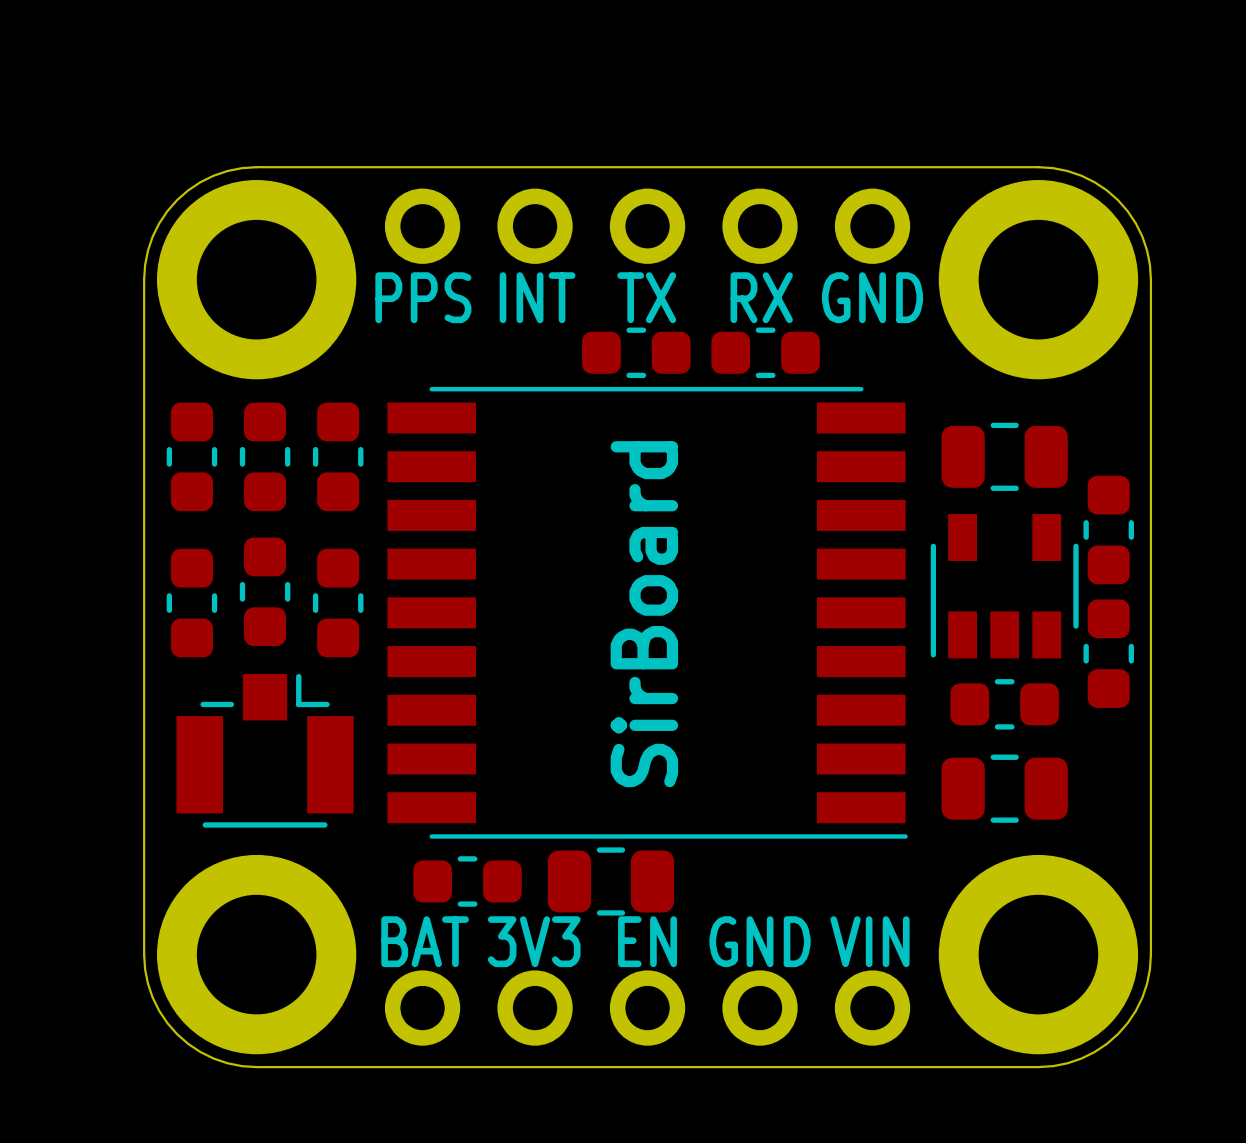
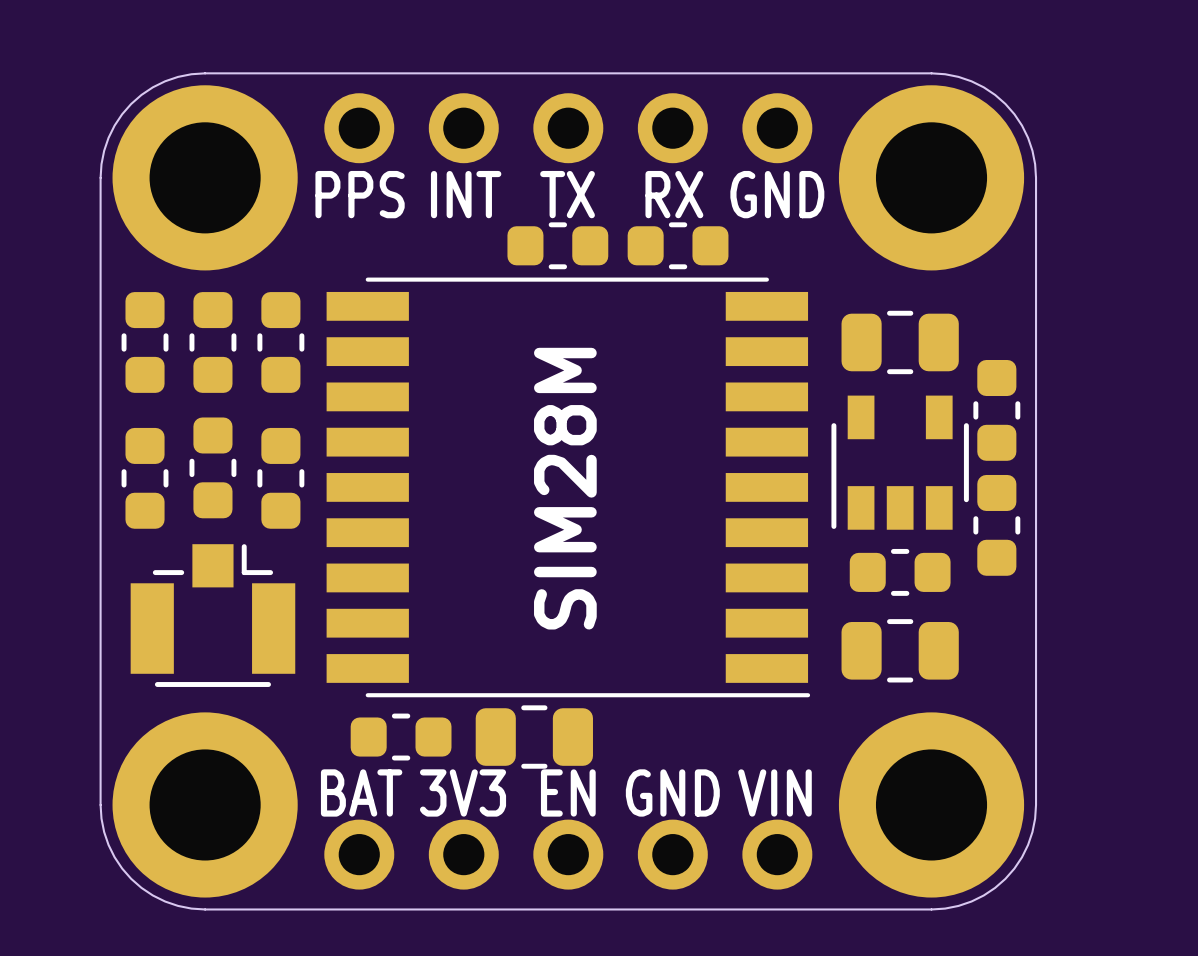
SirBoard name: SirBoard (644, 614) -> SIM28M (565, 488)

